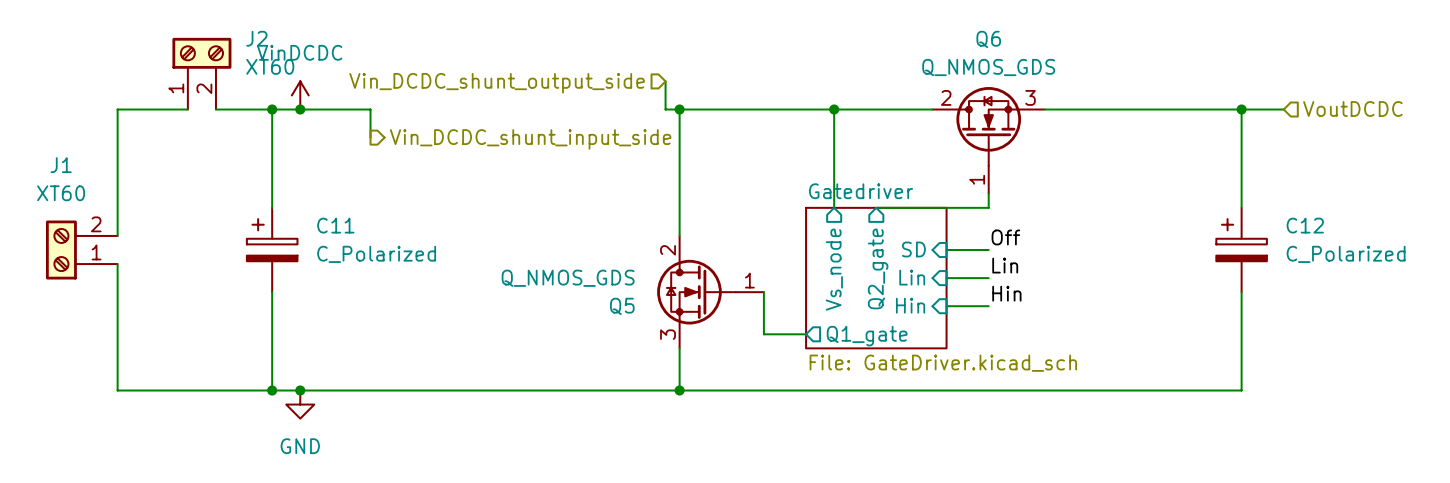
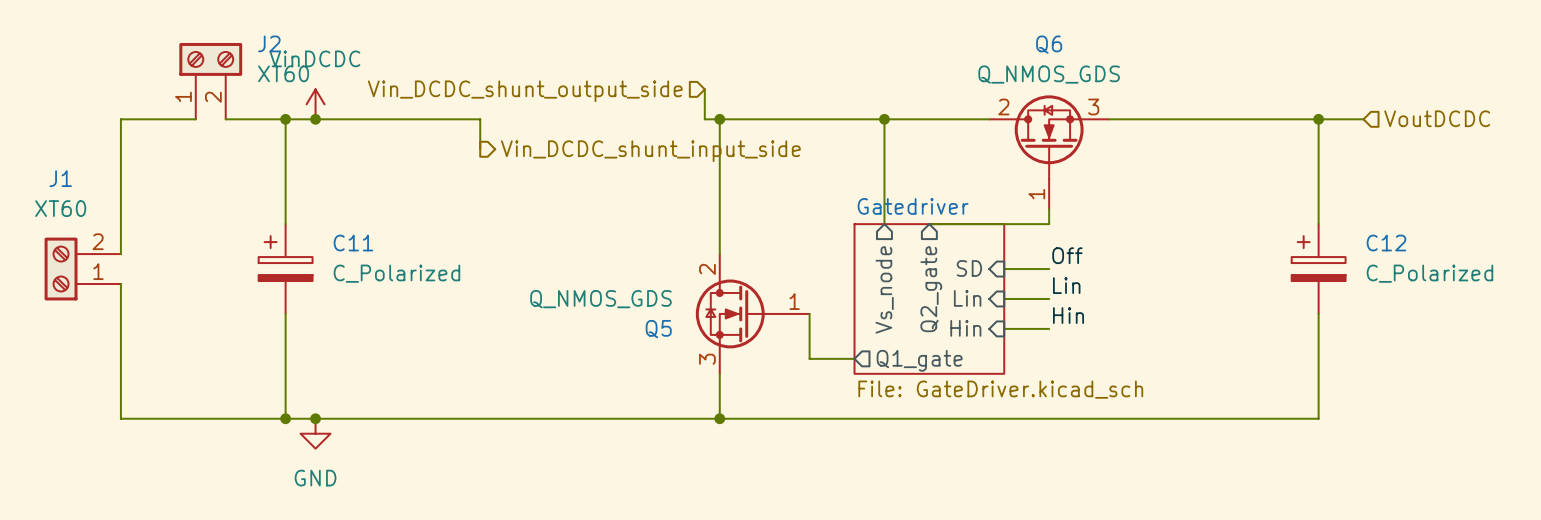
wire: (370, 109) (370, 137) -> (390, 119) (480, 119) (480, 149)
hierarchical label position: Vin_DCDC_shunt_input_side (530, 139) -> Vin_DCDC_shunt_input_side (650, 151)

